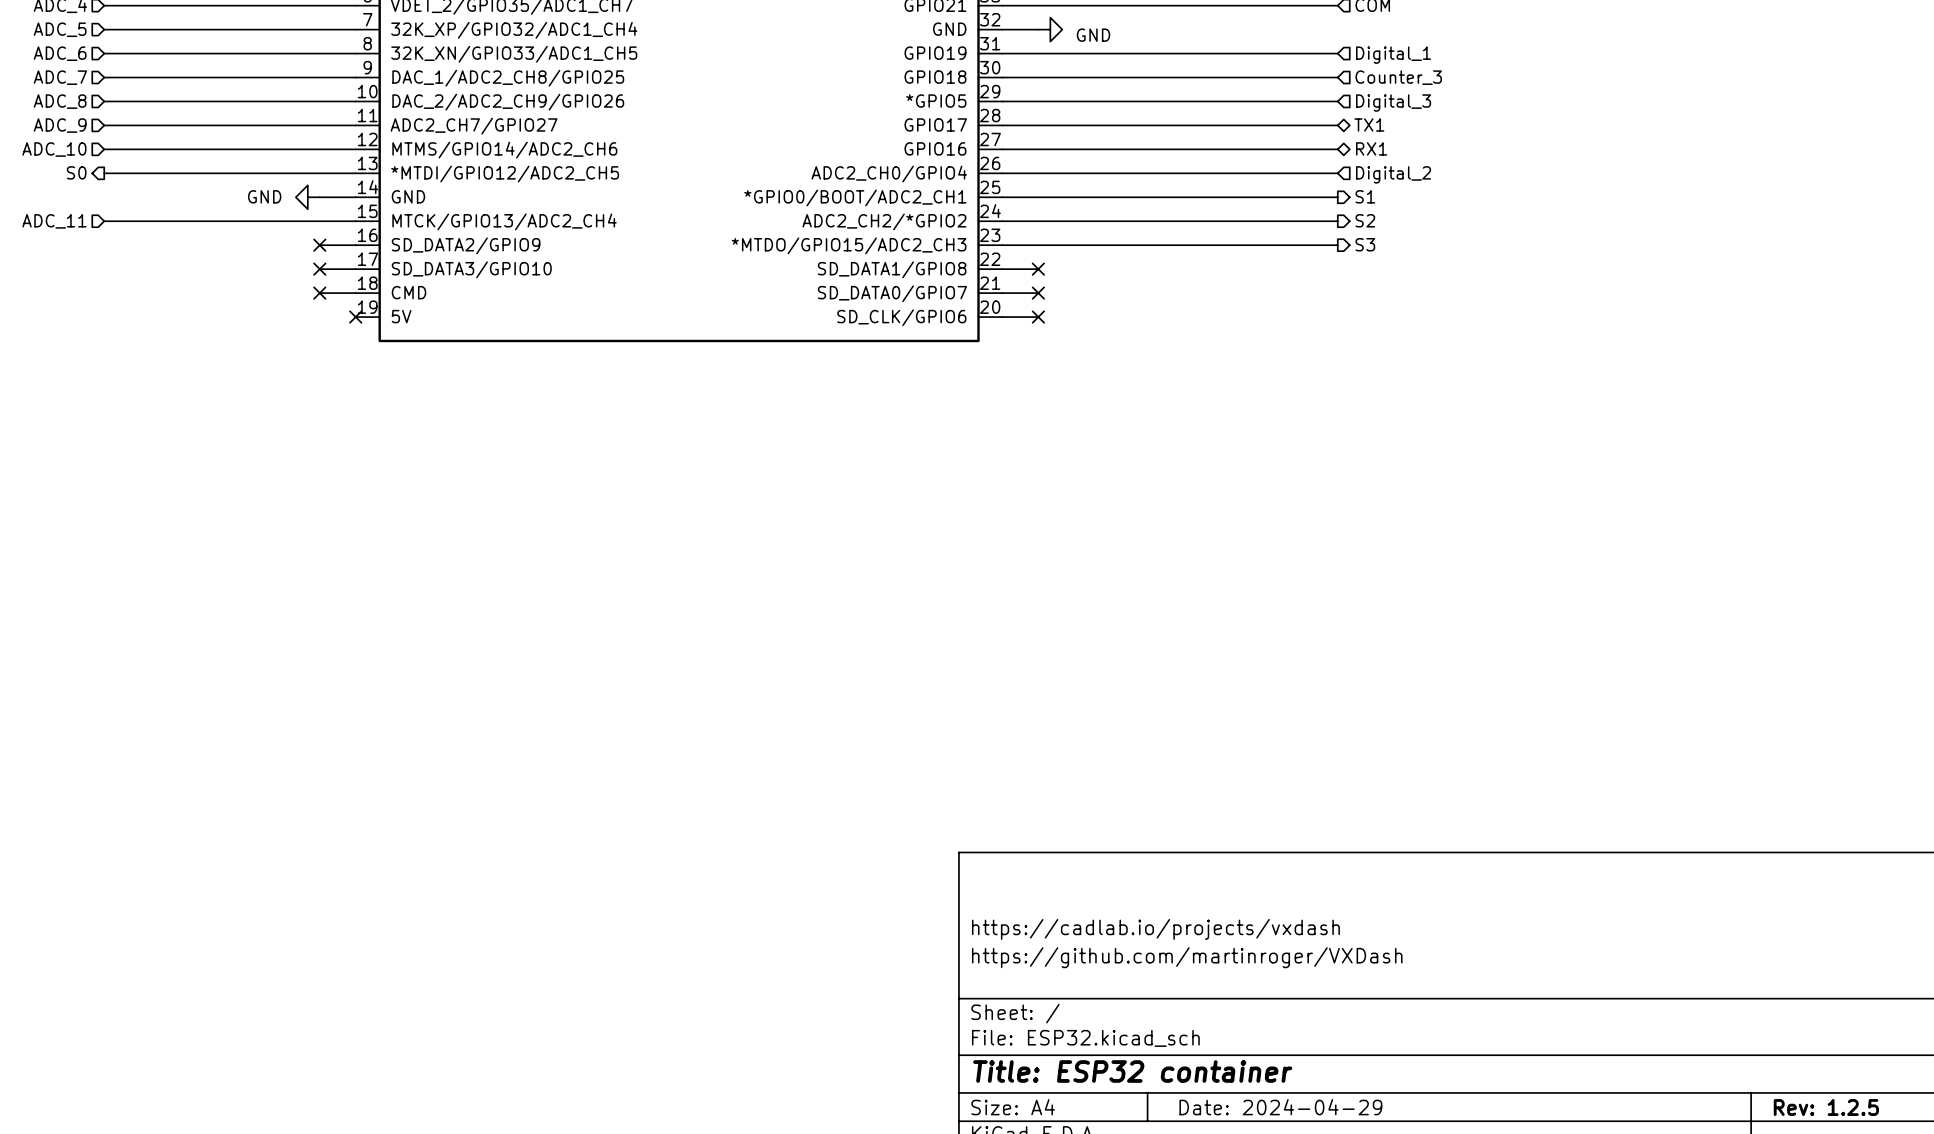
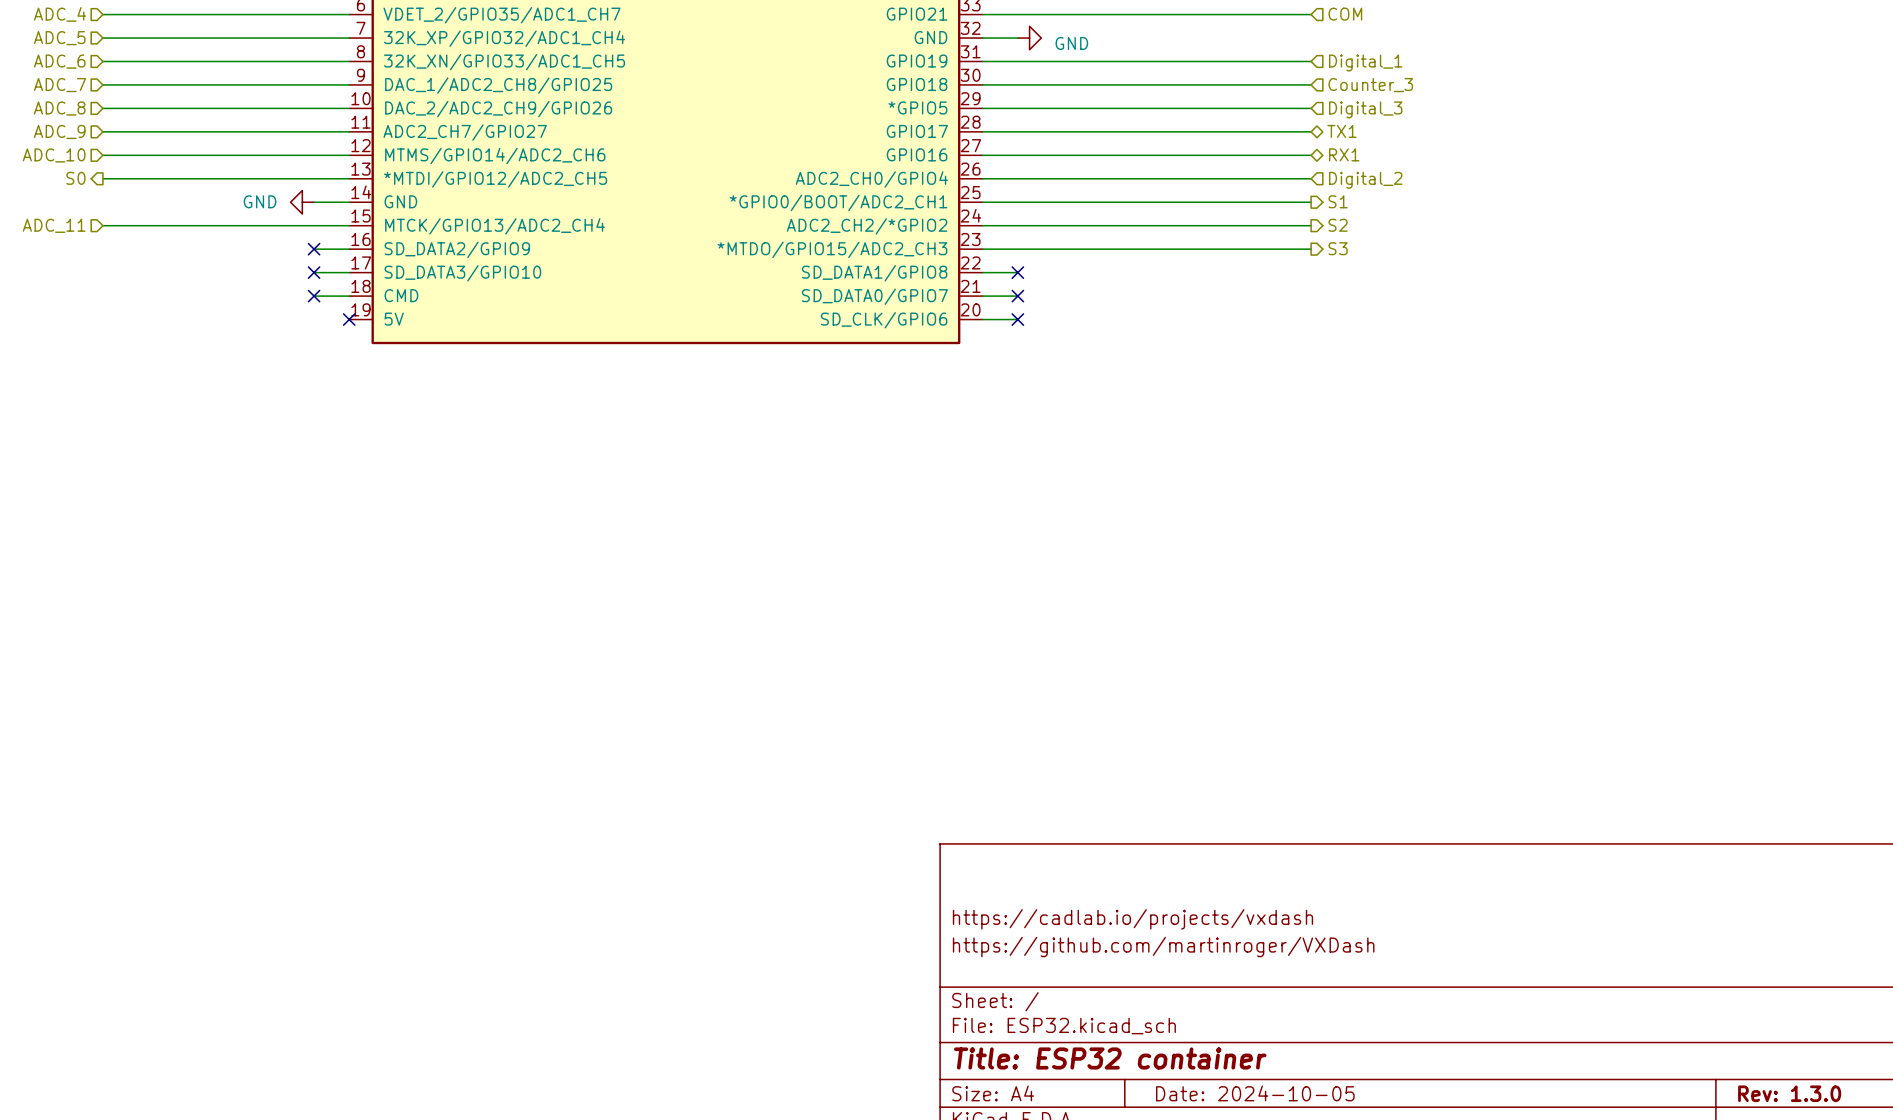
title block: Date: 2024-04-29 (1280, 1107) -> Date: 2024-10-05 (1255, 1093)
title block: Rev: 1.2.5 (1826, 1107) -> Rev: 1.3.0 (1789, 1093)

